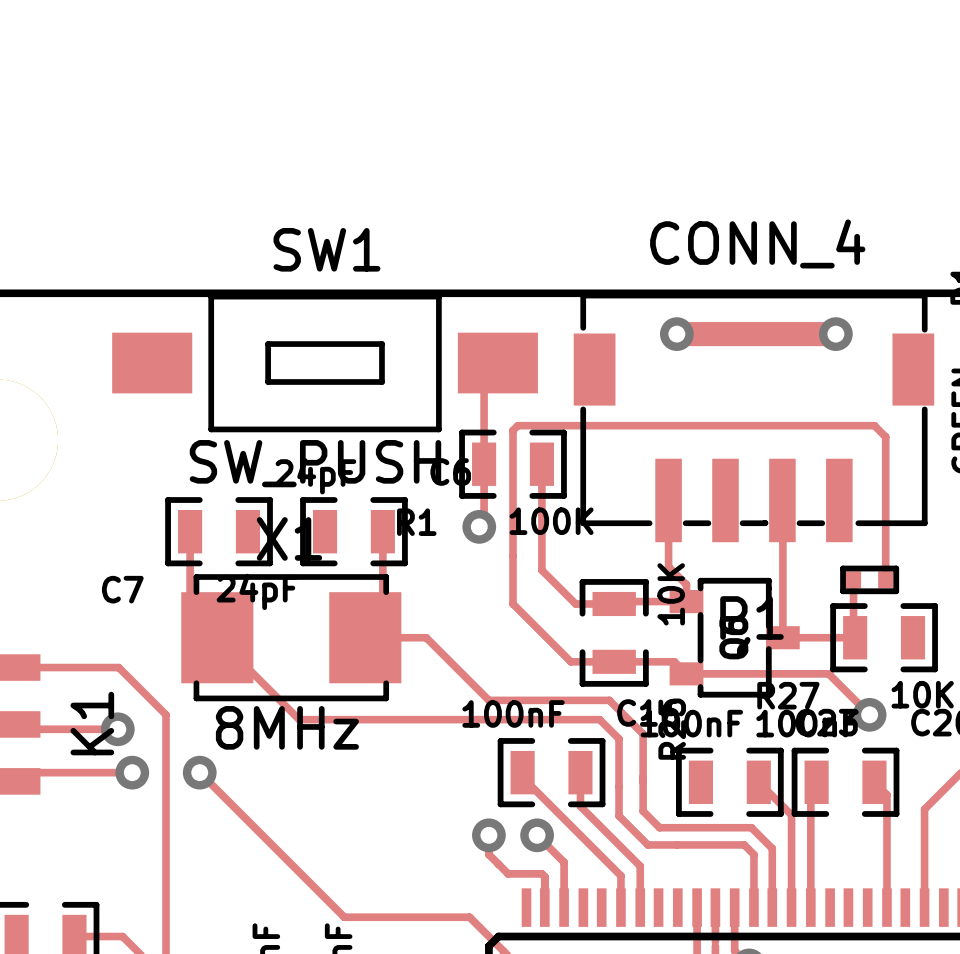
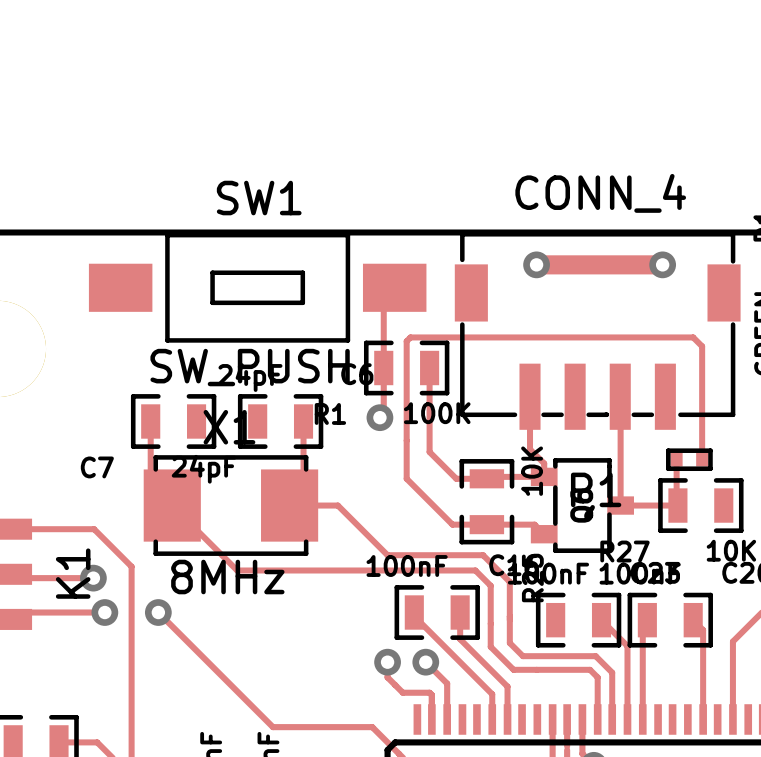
track: (686, 673) (828, 673) (869, 714) -> none
via: (869, 714) -> none

